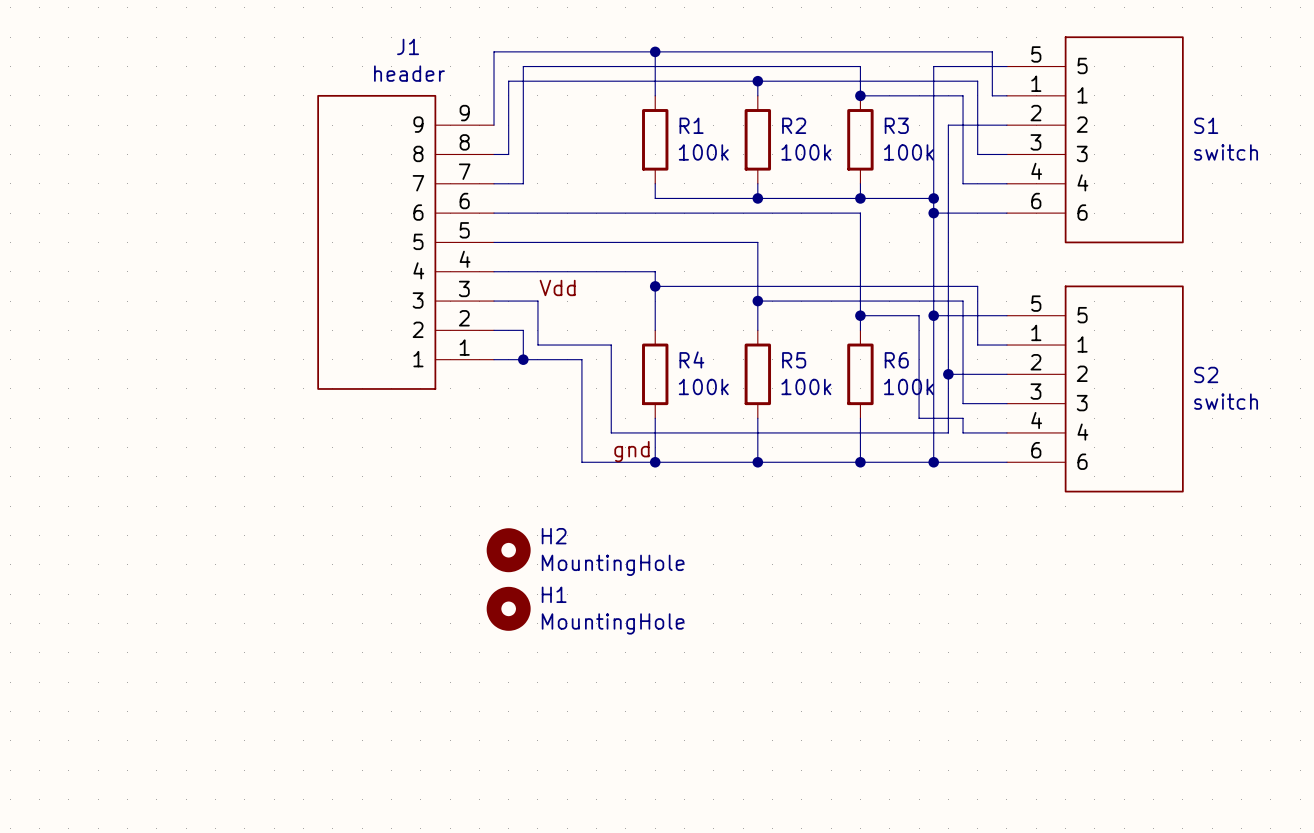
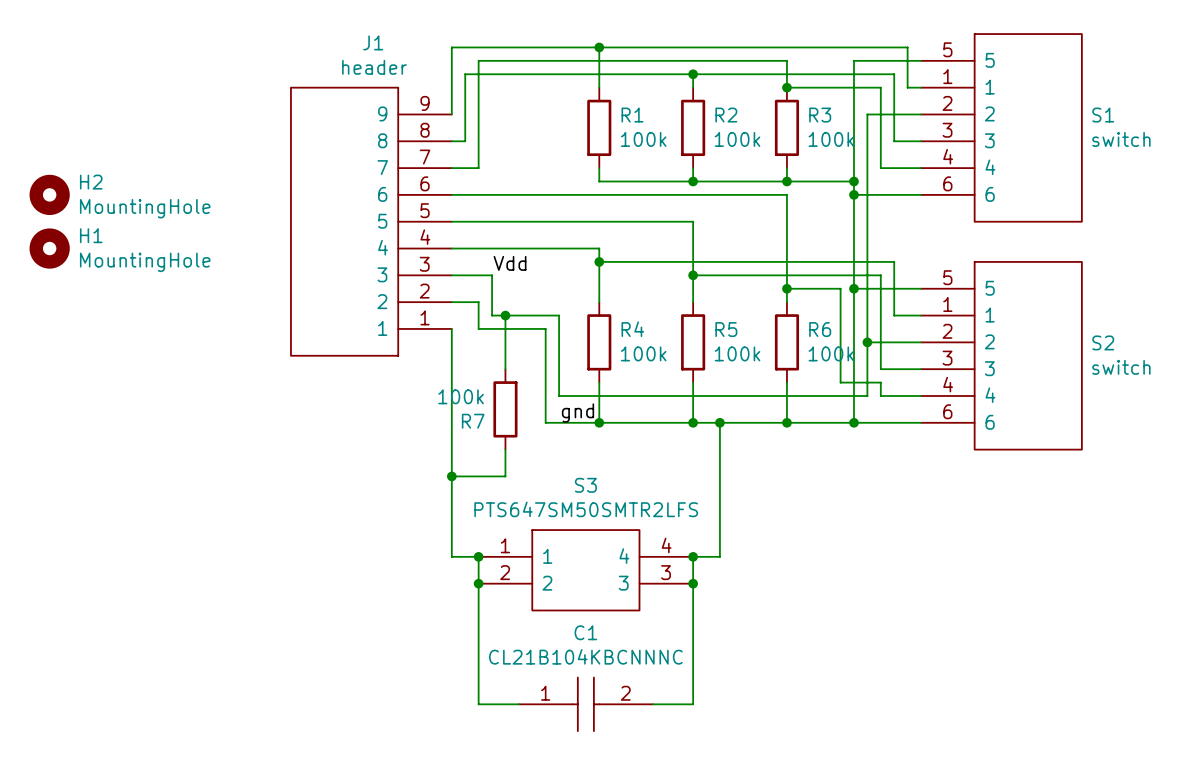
wire: none -> (505, 315) (505, 369)
wire: (494, 359) (523, 359) -> (451, 328) (451, 556) (478, 556) (478, 704) (518, 704)
junction position: (523, 359) -> (505, 315)
wire: (581, 359) (581, 462) (596, 462) -> (532, 328) (545, 328) (545, 422)
R7: none -> 100k (505, 409)
wire: none -> (719, 422) (719, 556) (693, 556) (693, 704) (652, 704)
junction: none -> (719, 422)
wire: none -> (505, 449) (505, 476) (451, 476)
junction: none -> (451, 476)
H2 position: (508, 550) -> (49, 194)
H1 position: (508, 608) -> (49, 248)
junction: none -> (478, 556)
junction: none -> (693, 556)
S3: none -> PTS647SM50SMTR2LFS (585, 570)
junction: none -> (478, 583)
junction: none -> (693, 583)
C1: none -> CL21B104KBCNNNC (585, 704)

